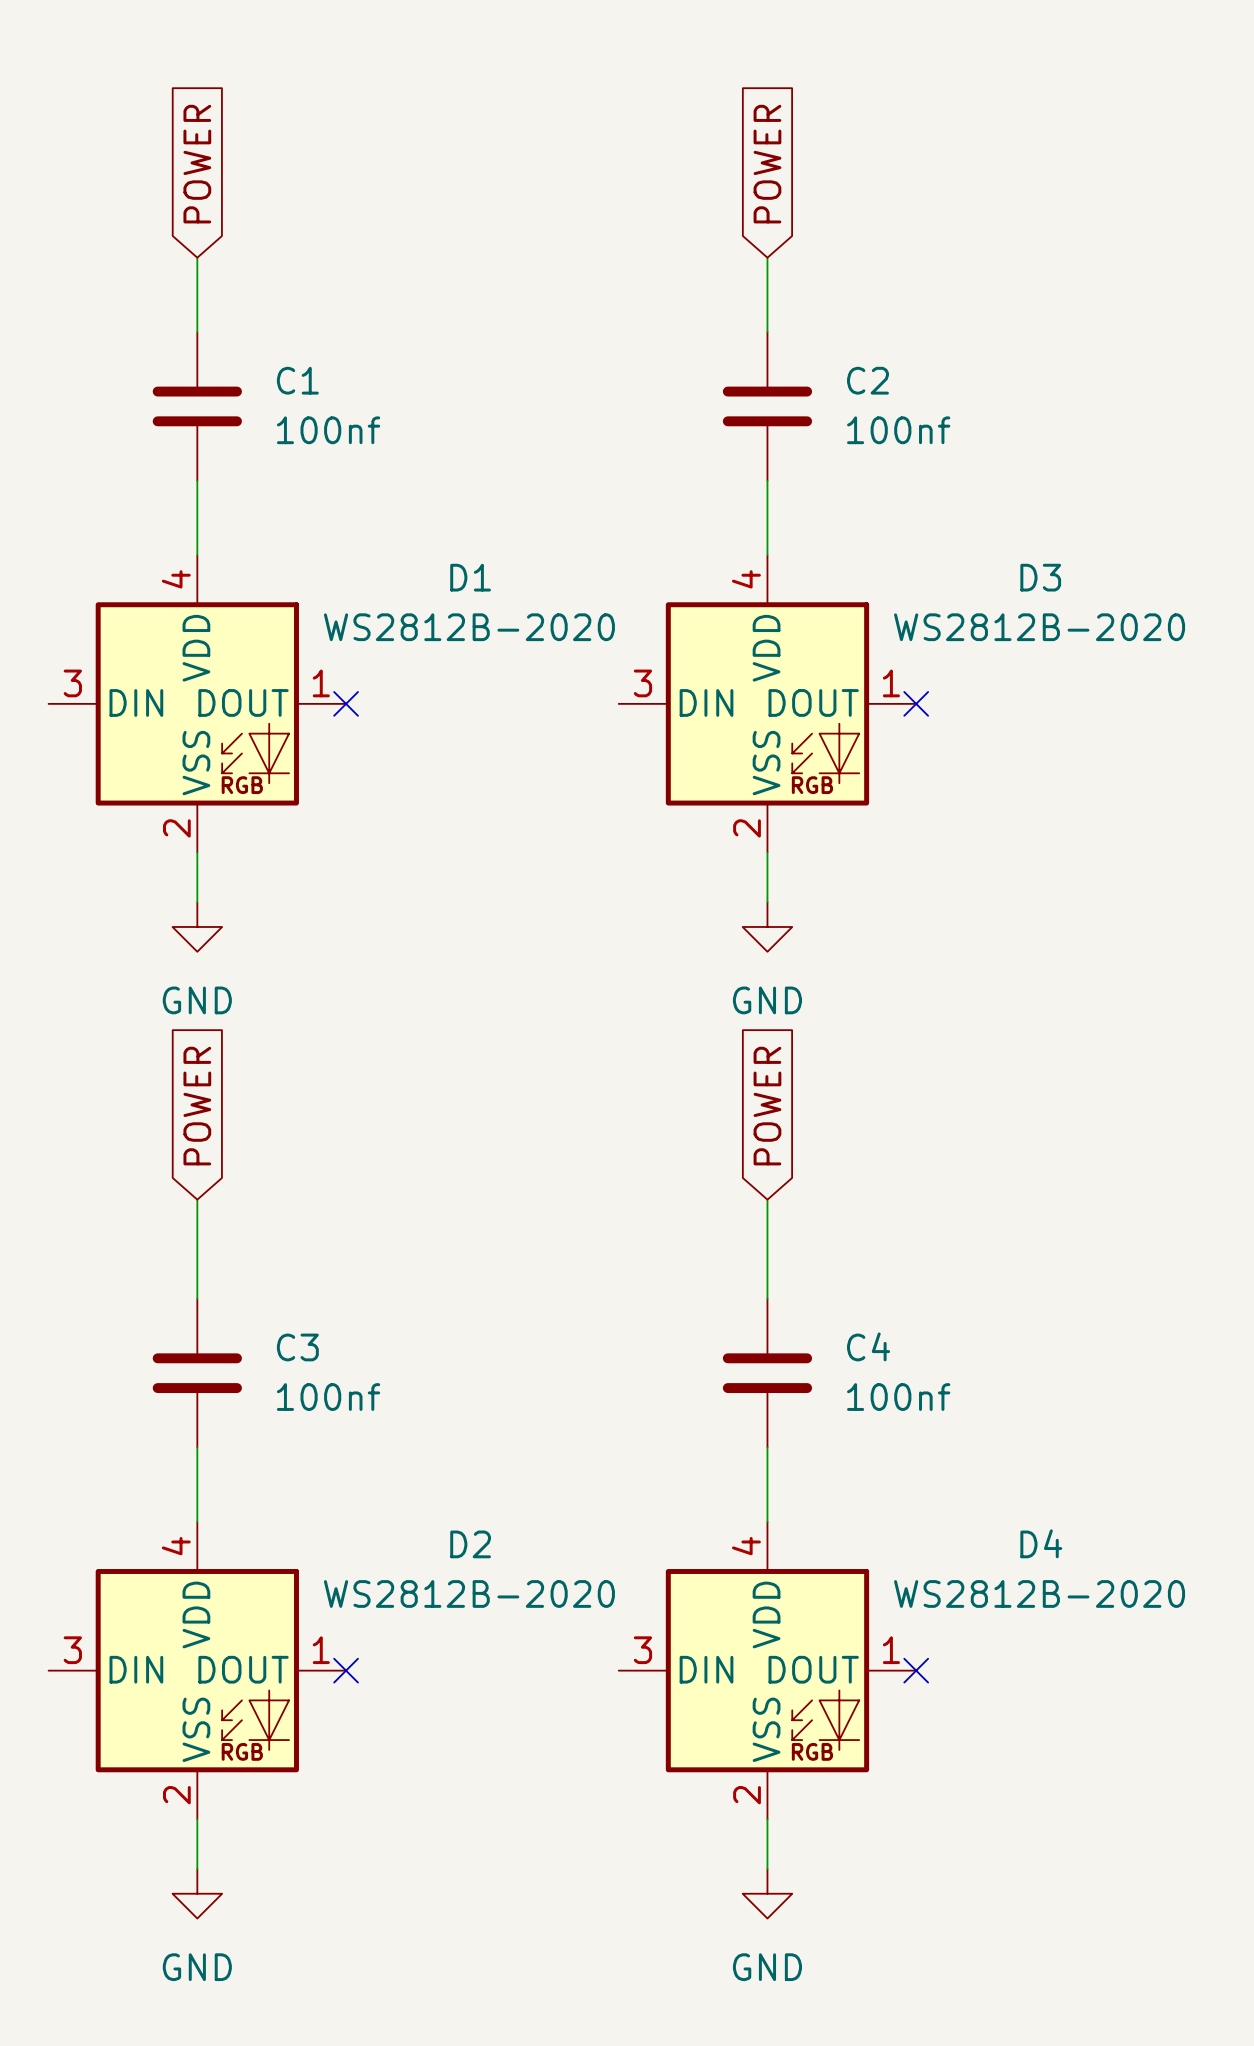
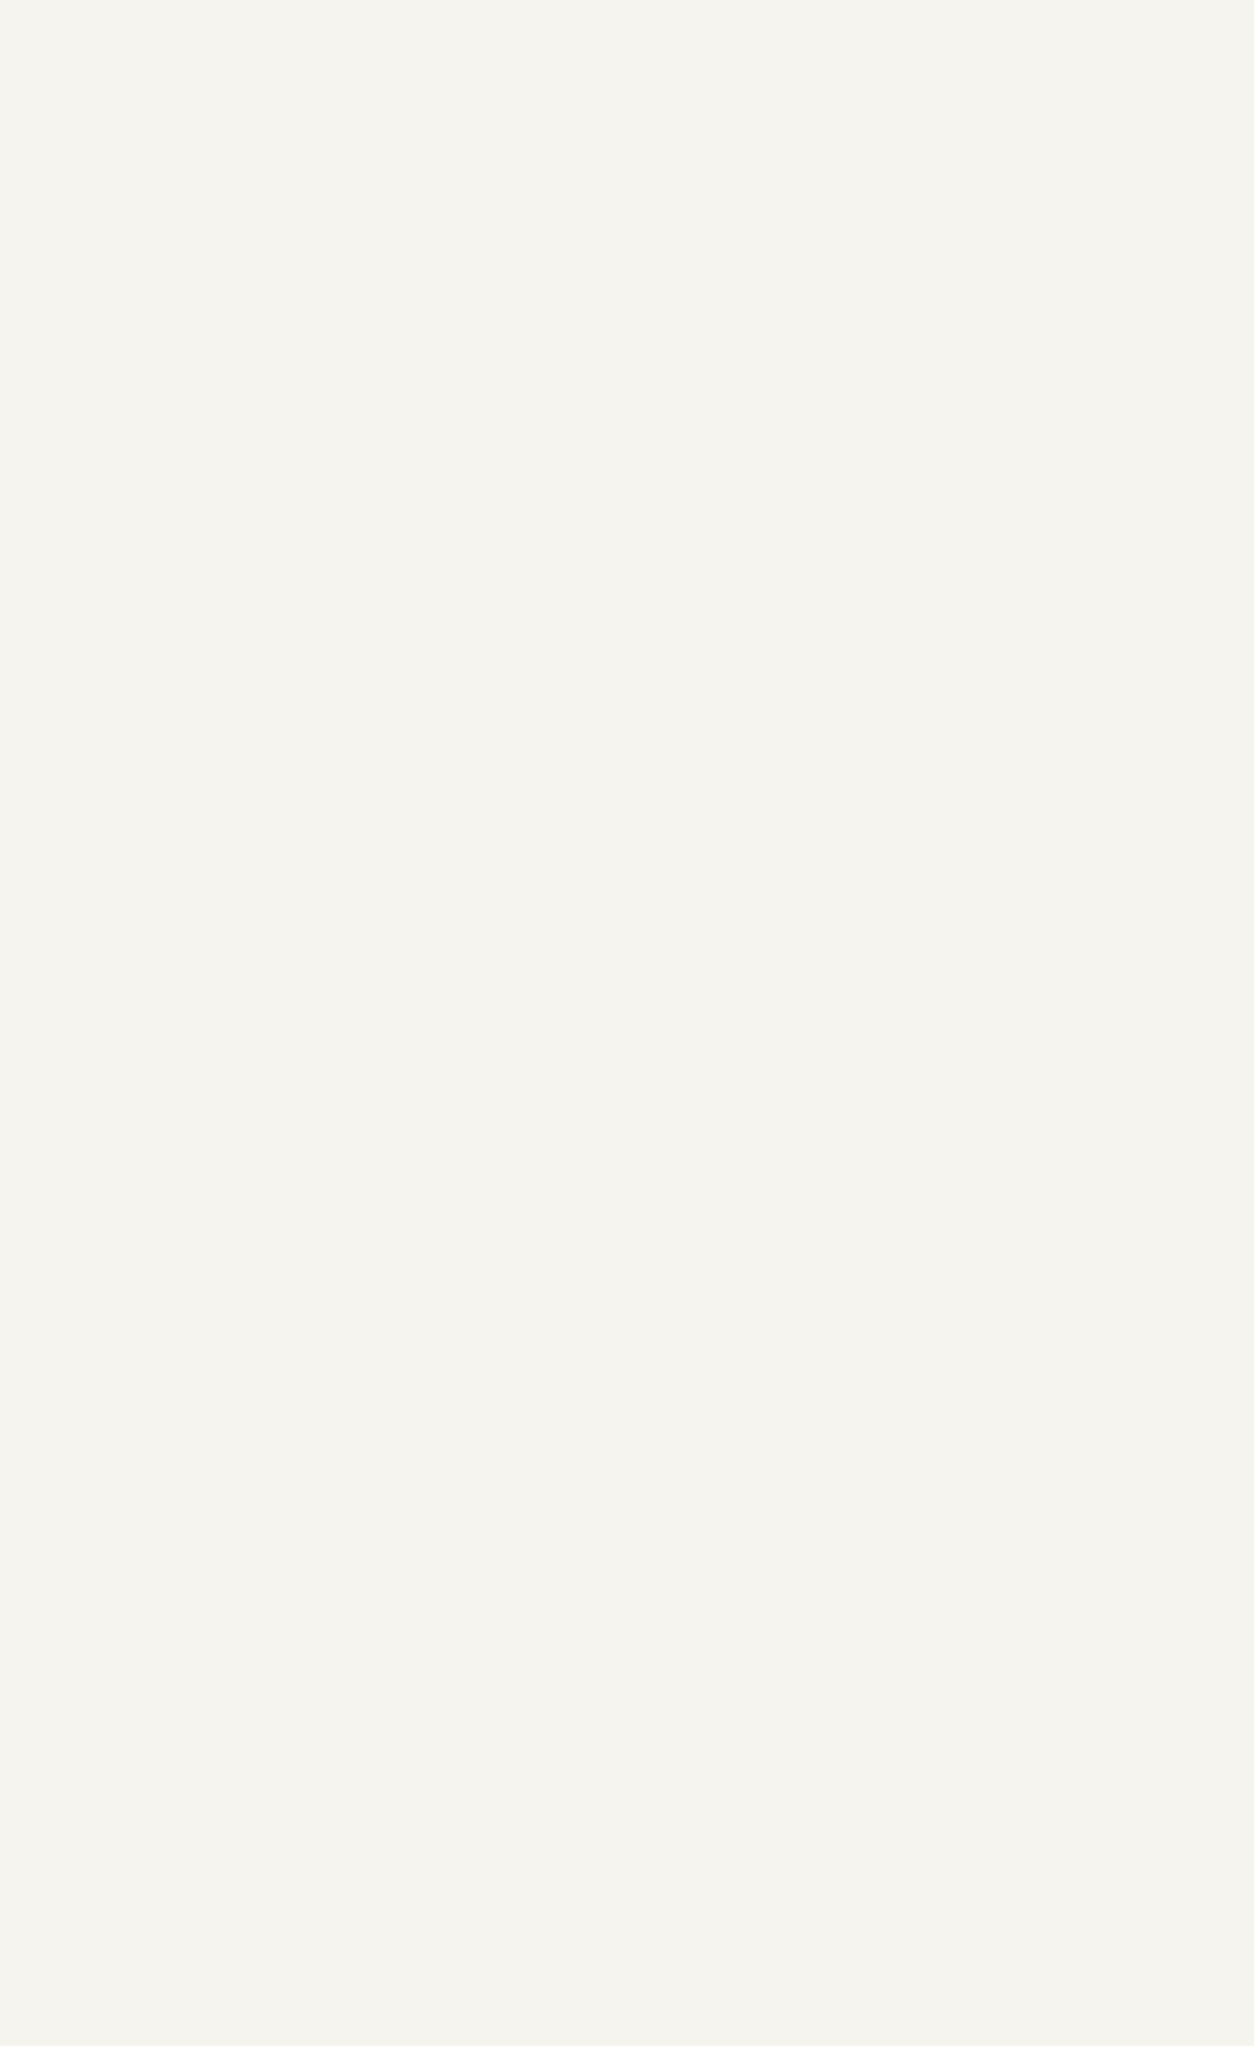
global label: POWER (197, 164) -> none
global label: POWER (767, 164) -> none
wire: (197, 257) (197, 332) -> none
wire: (767, 257) (767, 332) -> none
C1: 100nf (197, 406) -> none
C2: 100nf (767, 406) -> none
wire: (197, 480) (197, 555) -> none
wire: (767, 480) (767, 555) -> none
D1: WS2812B-2020 (197, 703) -> none
no-connect mark: (346, 703) -> none
D3: WS2812B-2020 (767, 703) -> none
no-connect mark: (916, 703) -> none
wire: (197, 852) (197, 902) -> none
wire: (767, 852) (767, 902) -> none
power symbol: GND (197, 926) -> none
power symbol: GND (767, 926) -> none
global label: POWER (197, 1106) -> none
global label: POWER (767, 1106) -> none
wire: (197, 1199) (197, 1298) -> none
wire: (767, 1199) (767, 1298) -> none
C3: 100nf (197, 1373) -> none
C4: 100nf (767, 1373) -> none
wire: (197, 1447) (197, 1521) -> none
wire: (767, 1447) (767, 1521) -> none
D2: WS2812B-2020 (197, 1670) -> none
no-connect mark: (346, 1670) -> none
D4: WS2812B-2020 (767, 1670) -> none
no-connect mark: (916, 1670) -> none
wire: (197, 1819) (197, 1868) -> none
wire: (767, 1819) (767, 1868) -> none
power symbol: GND (197, 1893) -> none
power symbol: GND (767, 1893) -> none

